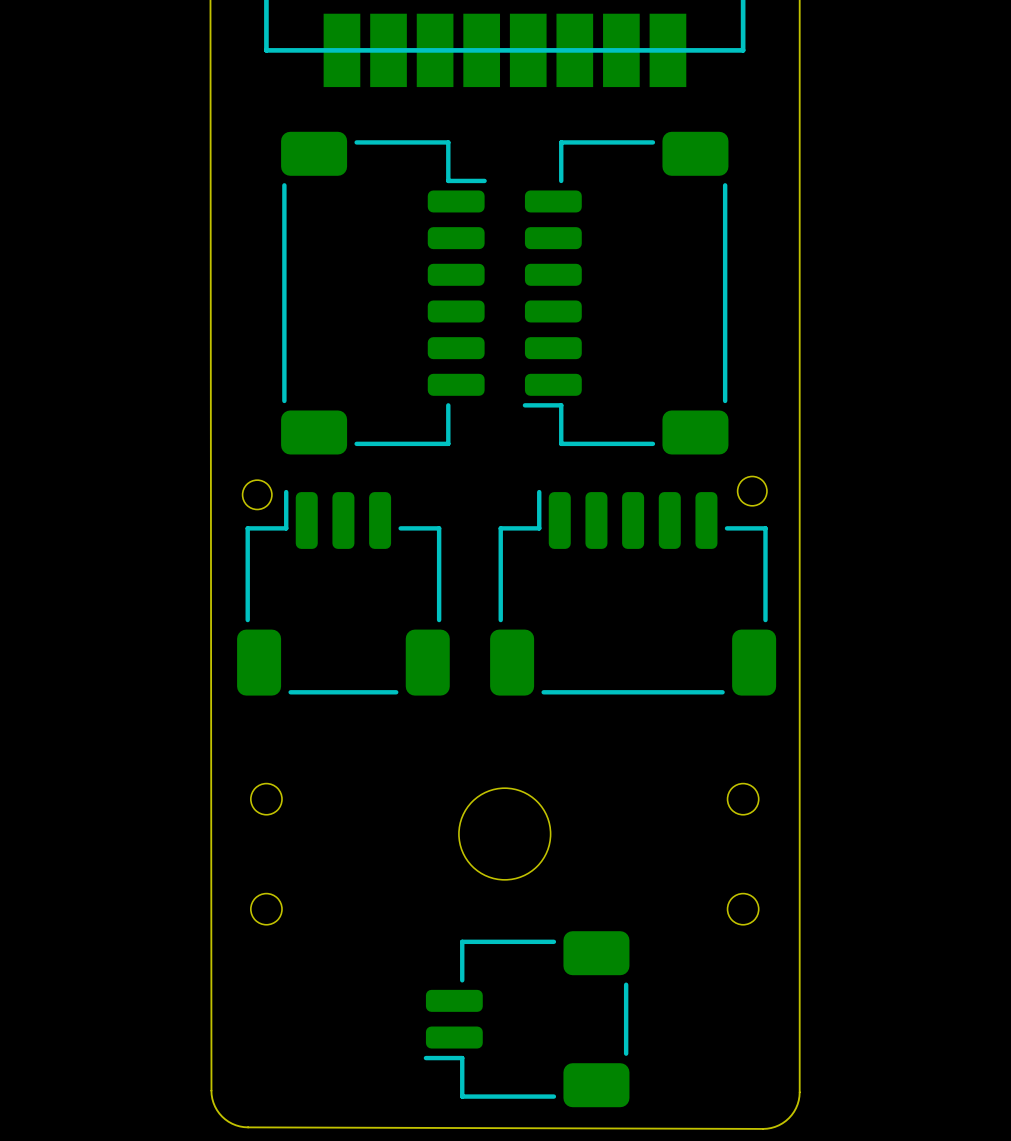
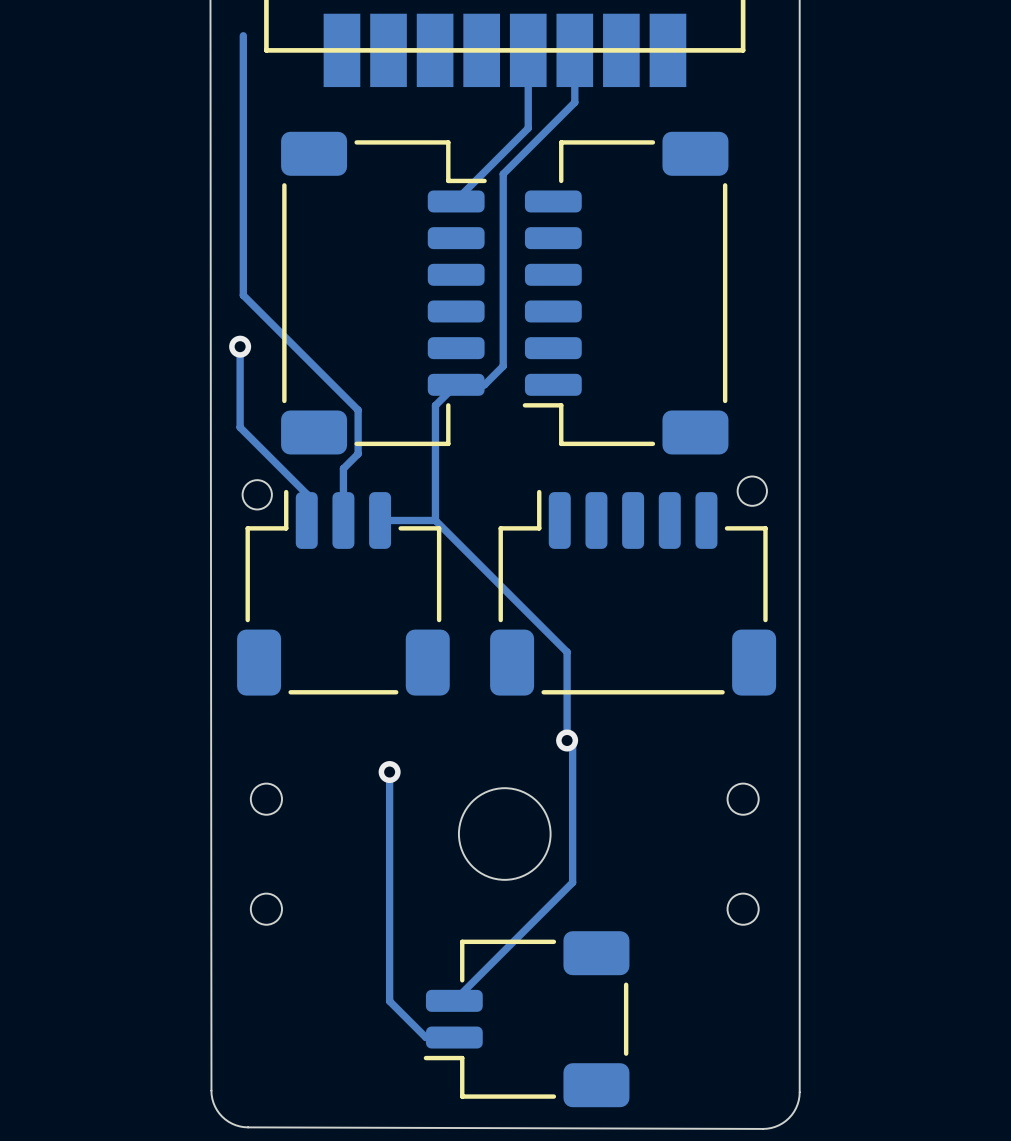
track: none -> (243, 35) (243, 295) (358, 410) (358, 453) (343, 468) (343, 520)
track: none -> (528, 50) (528, 128) (456, 201)
track: none -> (574, 50) (574, 102) (503, 174) (503, 366) (484, 384) (456, 384) (435, 405) (435, 520)
track: none -> (240, 346) (240, 427) (306, 494) (306, 520)
via: none -> (240, 346)
track: none -> (435, 520) (567, 652) (567, 740) (572, 746) (572, 882) (454, 1000)
track: none -> (435, 520) (380, 520)
via: none -> (567, 740)
track: none -> (389, 772) (389, 1001) (425, 1037) (454, 1037)
via: none -> (389, 772)

